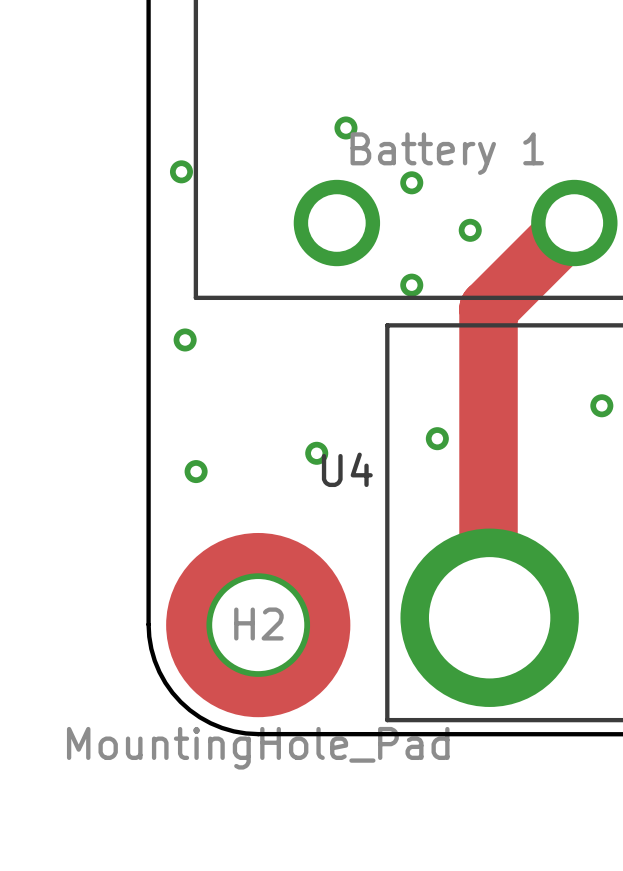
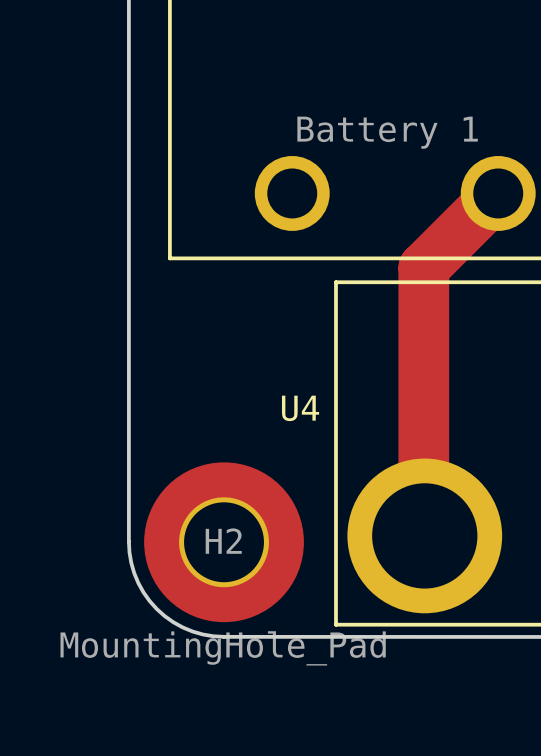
via: (345, 127) -> none
via: (181, 171) -> none
via: (411, 182) -> none
via: (470, 230) -> none
via: (411, 285) -> none
via: (185, 339) -> none
via: (601, 405) -> none
via: (437, 438) -> none
via: (316, 453) -> none
via: (196, 471) -> none

